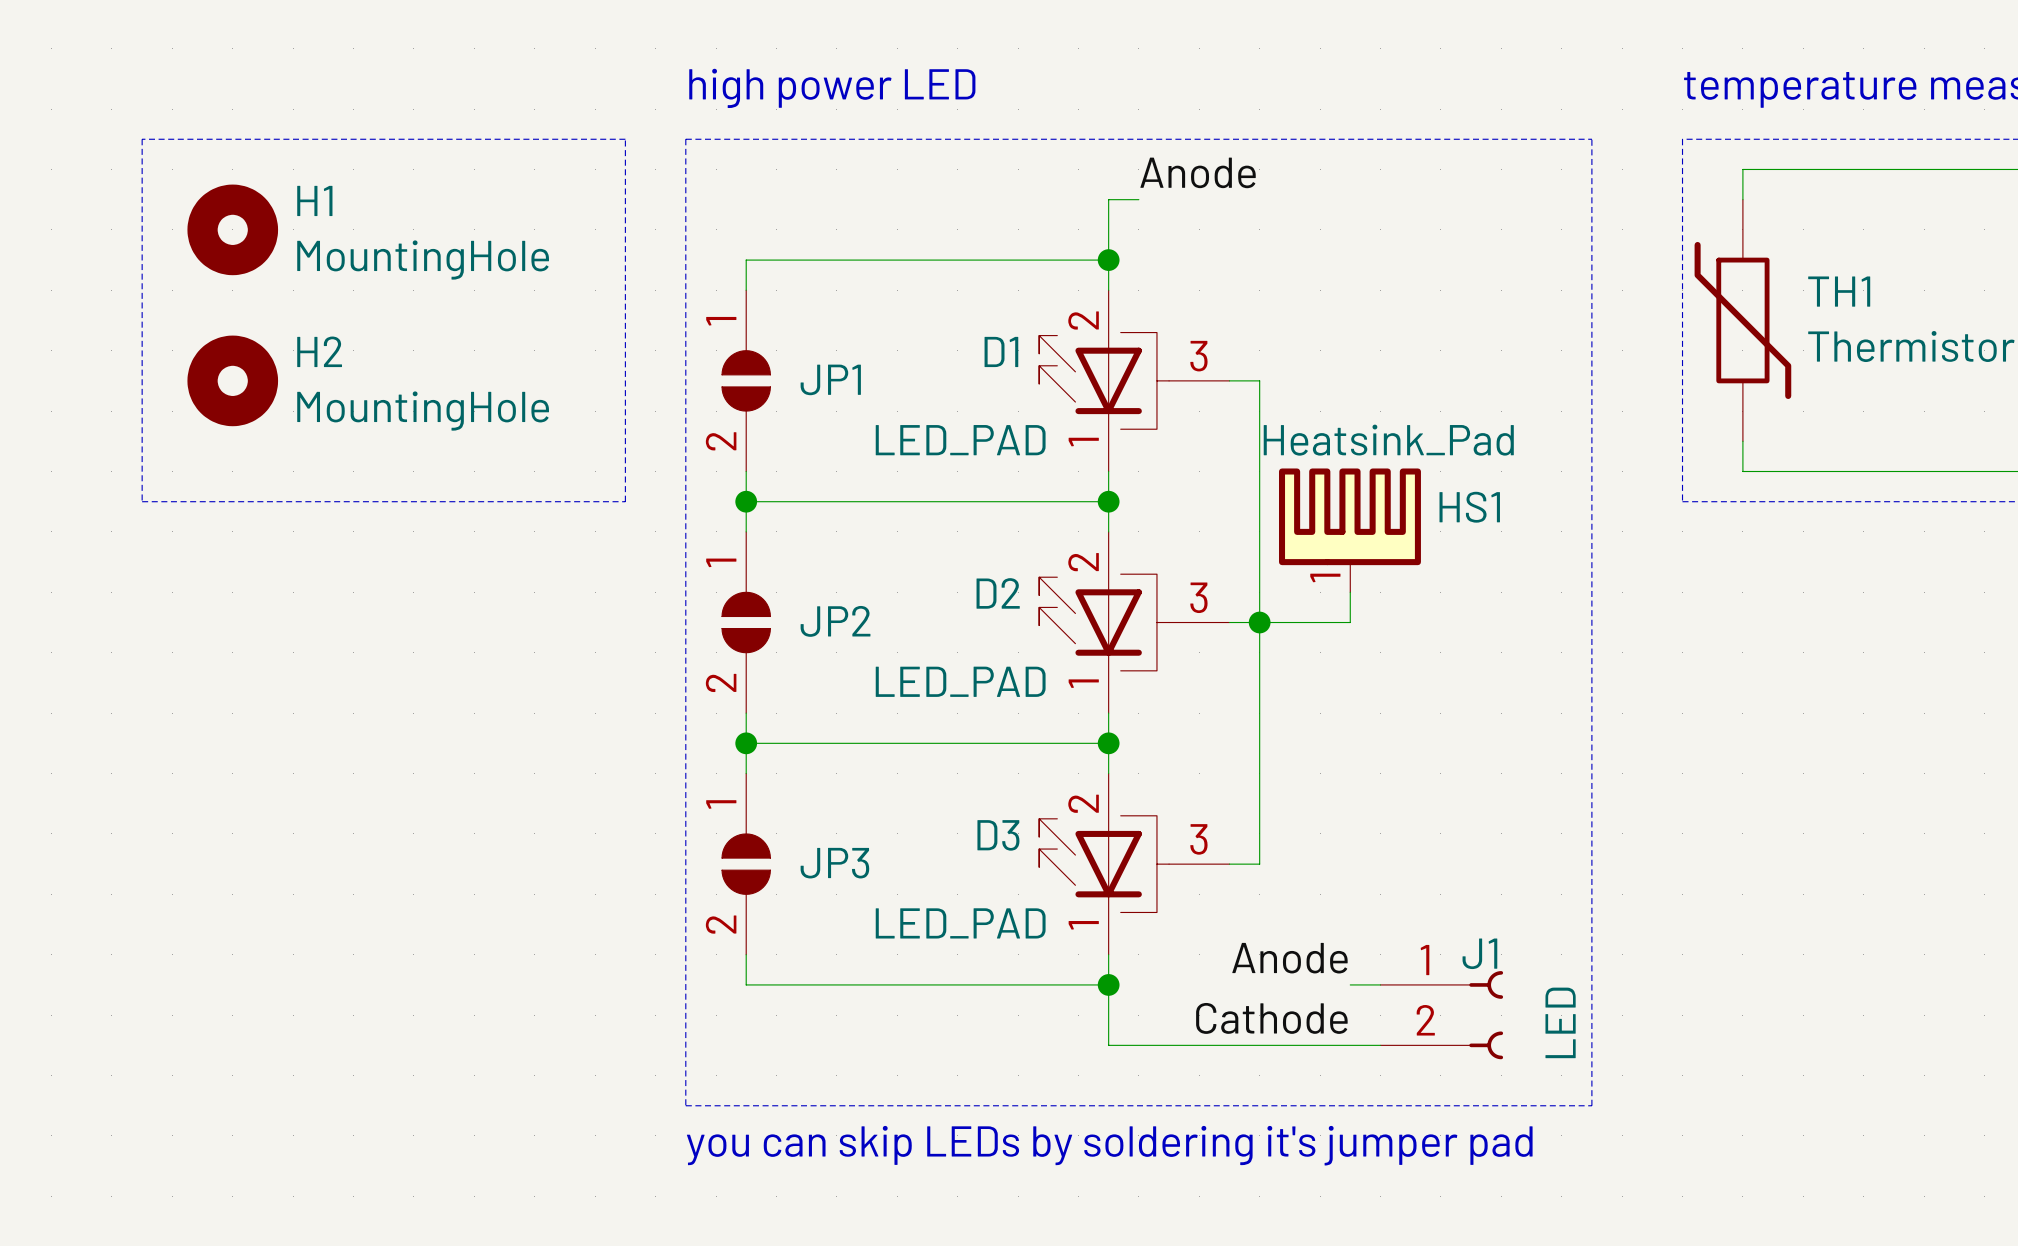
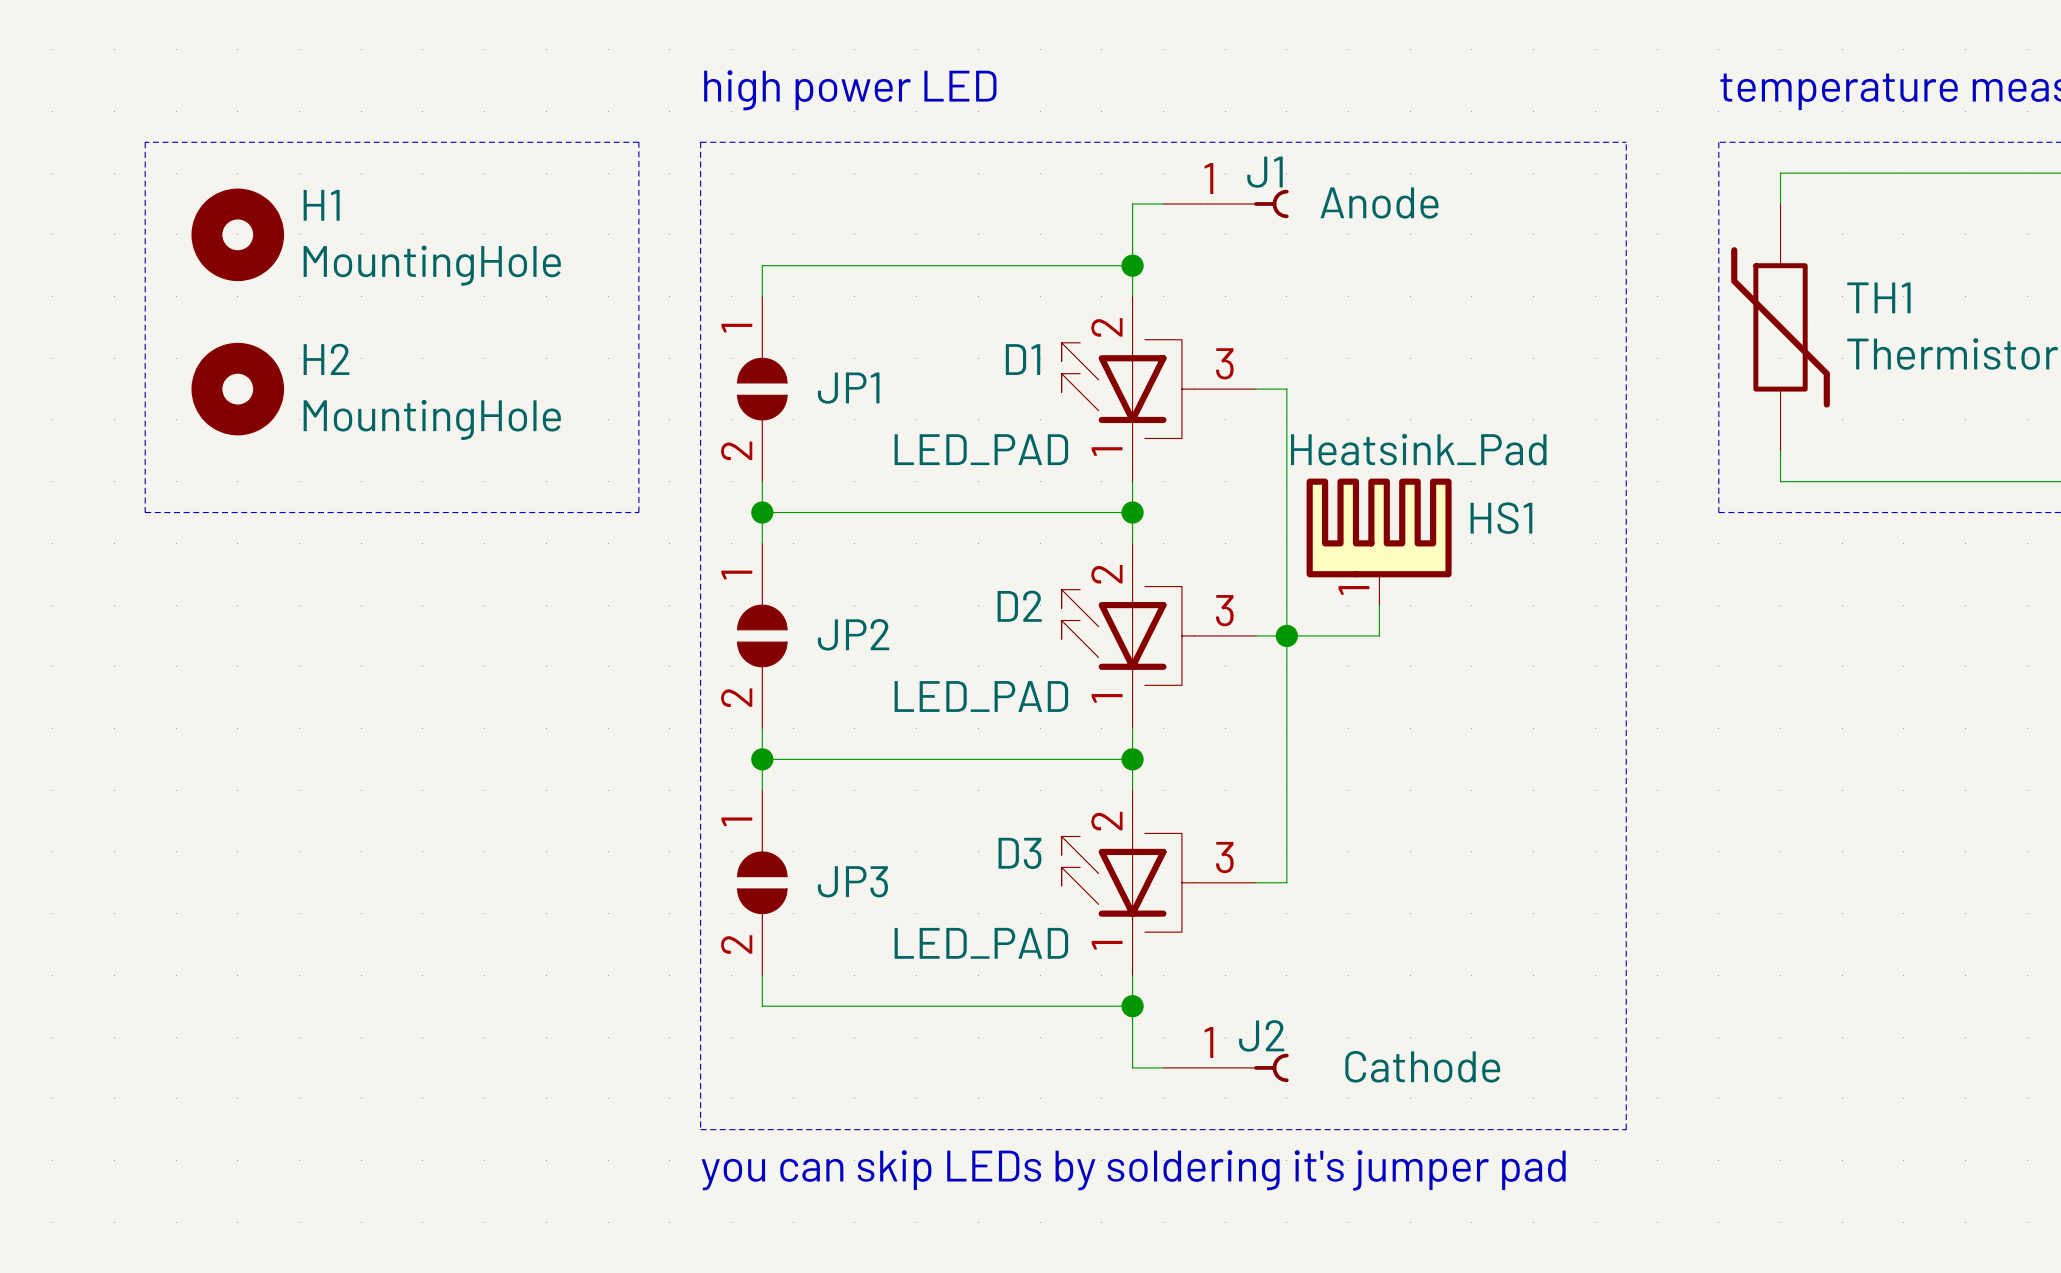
label: Anode (1198, 172) -> none
label: Anode (1289, 958) -> none
J1 symbol: [1380, 971, 1504, 1060] -> [1163, 189, 1289, 219]
wire: (1350, 984) (1380, 984) -> none
label: Cathode (1271, 1018) -> none
J1 value: LED (1560, 1022) -> Anode (1379, 203)
wire: (1138, 1045) (1380, 1045) -> none
J2: none -> Cathode (1226, 1067)

